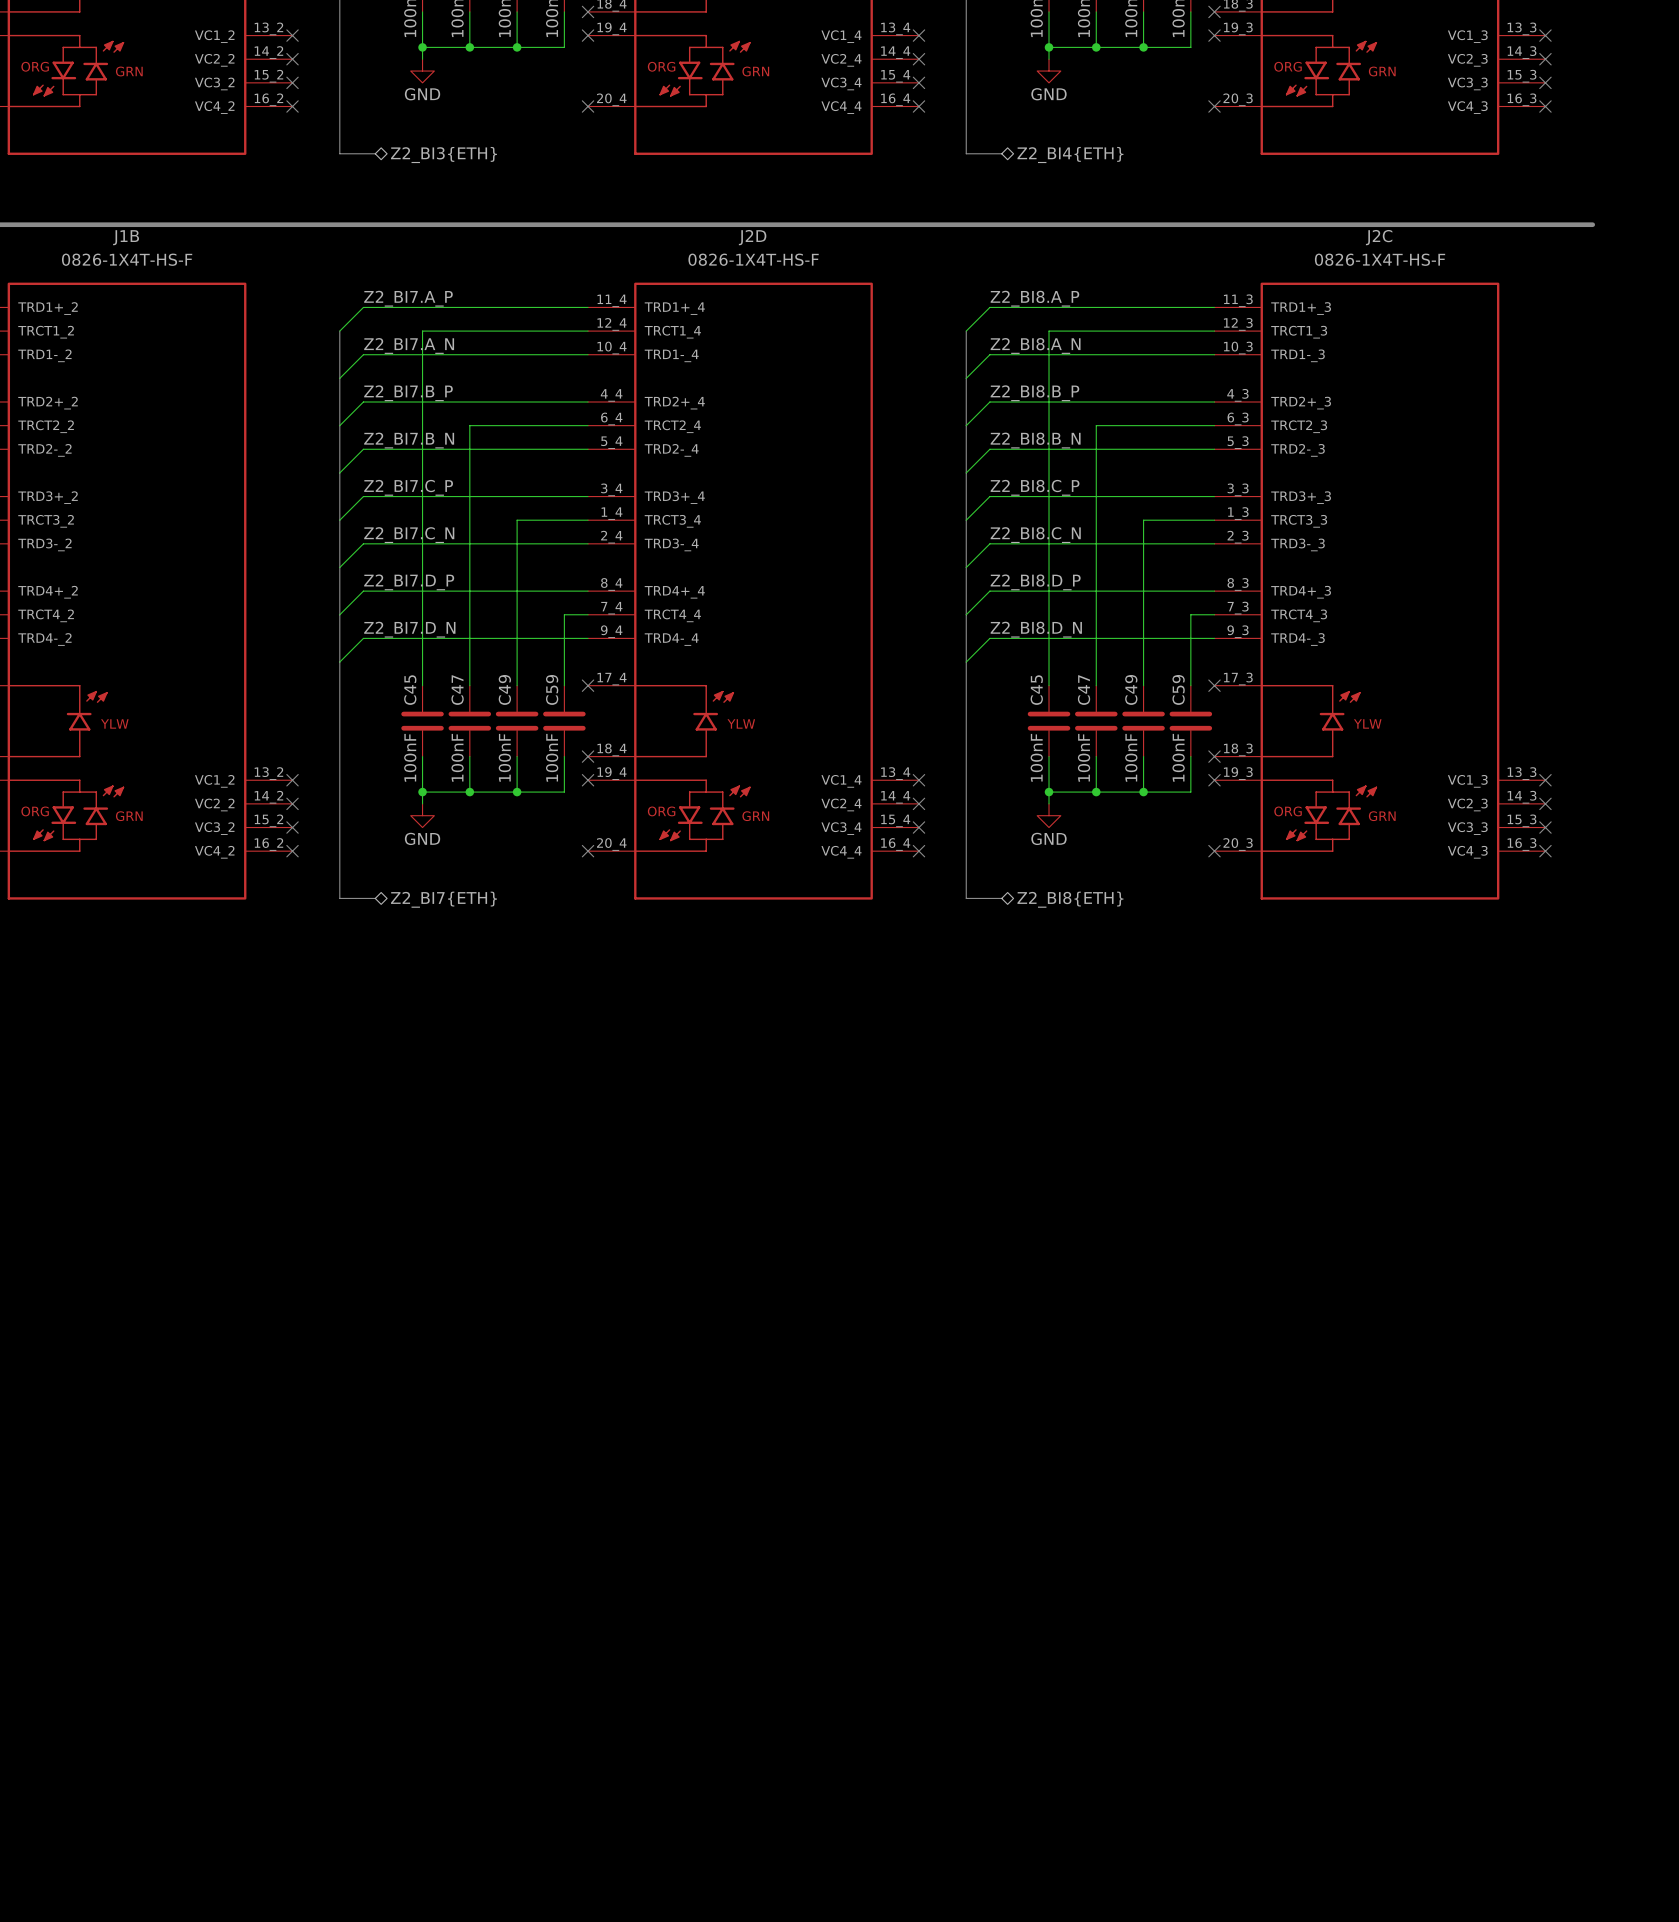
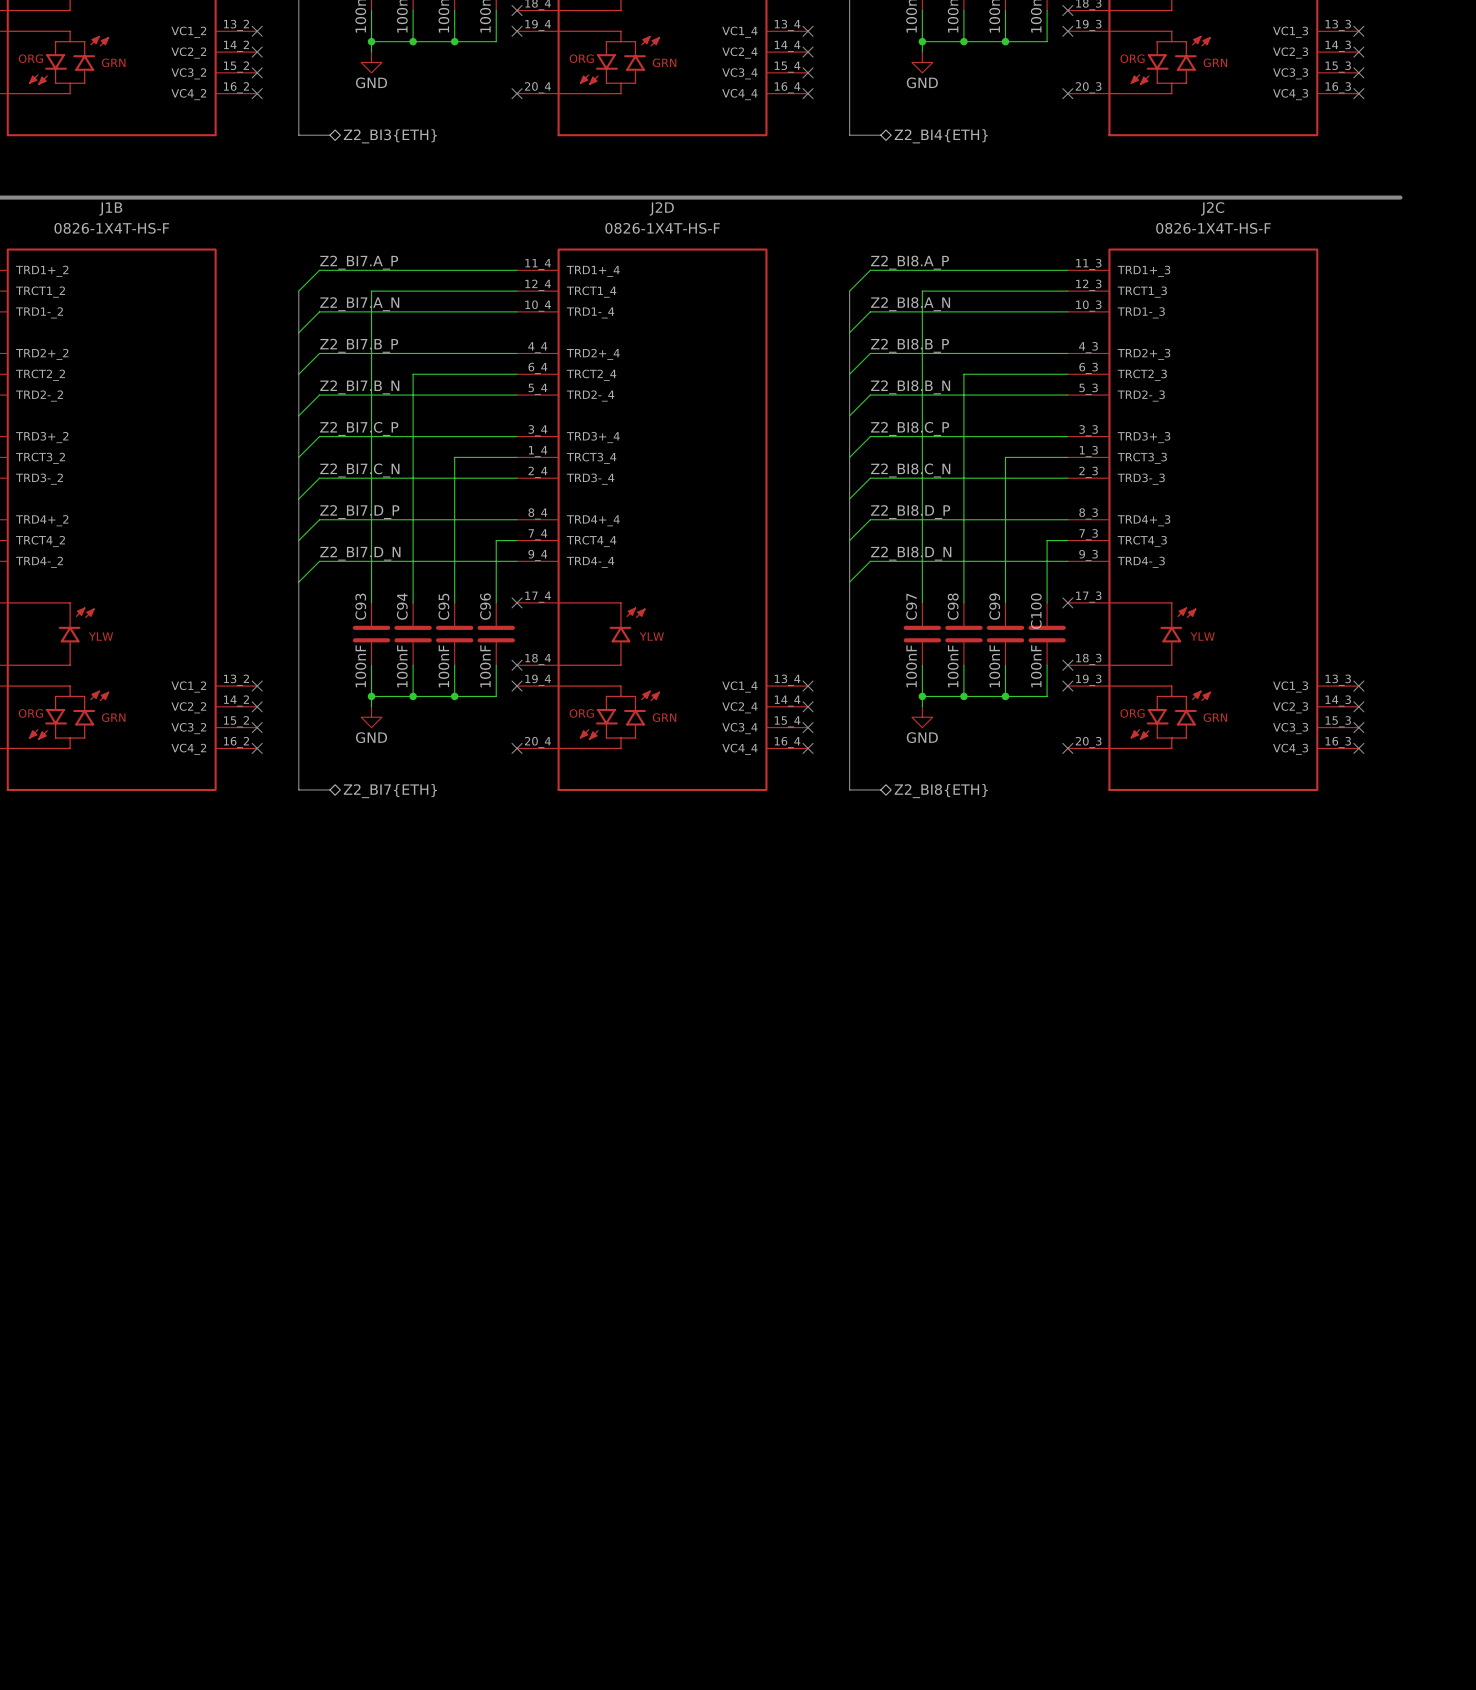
C49 name: C49 (504, 689) -> C95 (443, 606)
C59 name: C59 (552, 689) -> C96 (485, 606)
C49 name: C49 (1131, 689) -> C99 (994, 606)
C59 name: C59 (1178, 689) -> C100 (1036, 611)
C45 name: C45 (410, 690) -> C93 (360, 606)
C47 name: C47 (457, 690) -> C94 (402, 606)
C45 name: C45 (1036, 690) -> C97 (911, 606)
C47 name: C47 (1084, 690) -> C98 (953, 606)

